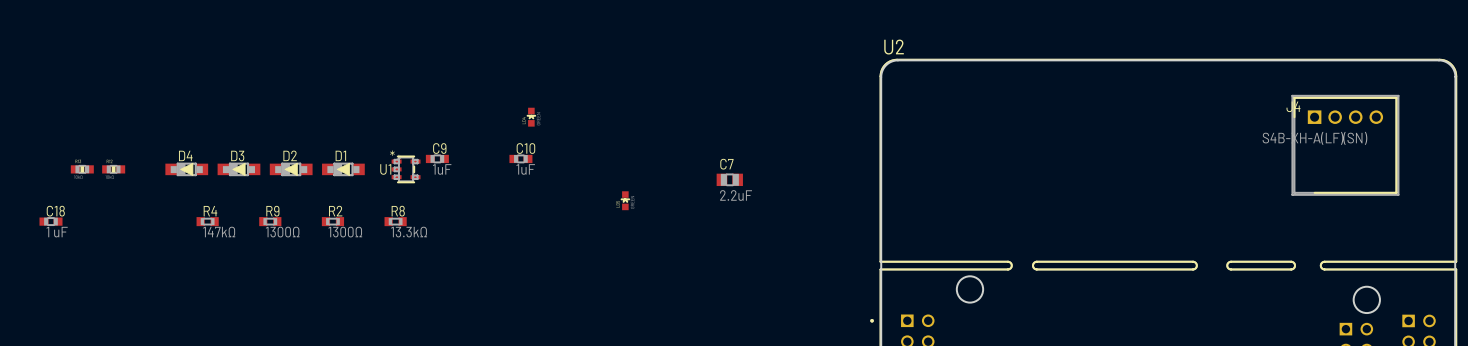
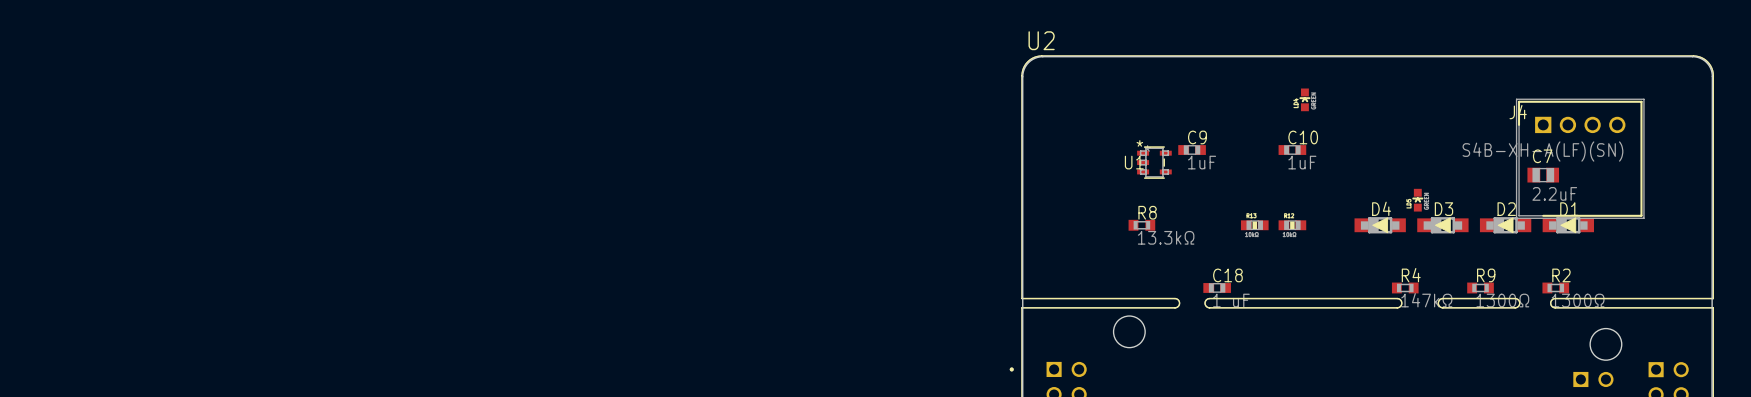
part position: (531, 117) -> (1304, 99)
C9 position: (437, 158) -> (1192, 150)
C10 position: (520, 158) -> (1292, 150)
part position: (82, 169) -> (1254, 225)
part position: (113, 169) -> (1292, 225)
D4 position: (186, 169) -> (1380, 225)
D3 position: (238, 169) -> (1442, 225)
D2 position: (291, 169) -> (1505, 225)
D1 position: (343, 169) -> (1568, 225)
U1 position: (406, 169) -> (1154, 162)
C7 position: (729, 179) -> (1543, 175)
part position: (625, 200) -> (1417, 200)
C18 position: (51, 221) -> (1217, 287)
R4 position: (207, 221) -> (1405, 287)
R9 position: (270, 221) -> (1480, 287)
R2 position: (332, 221) -> (1555, 287)
R8 position: (395, 221) -> (1141, 225)

